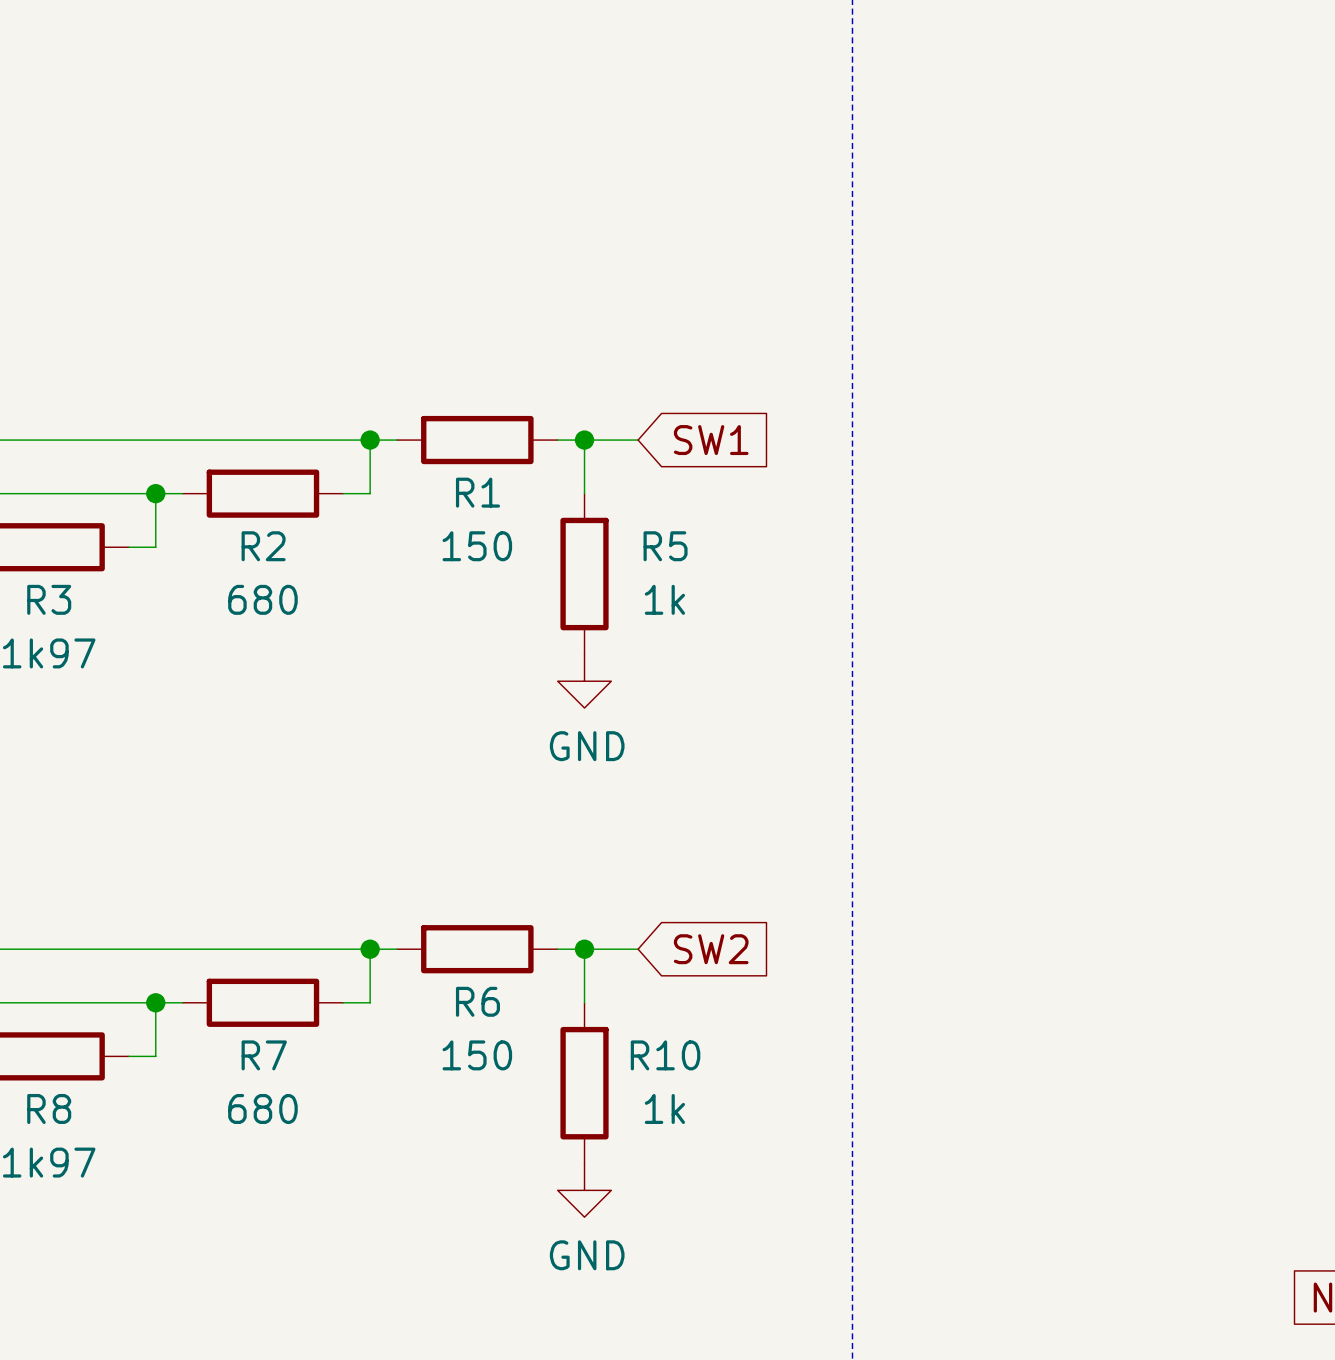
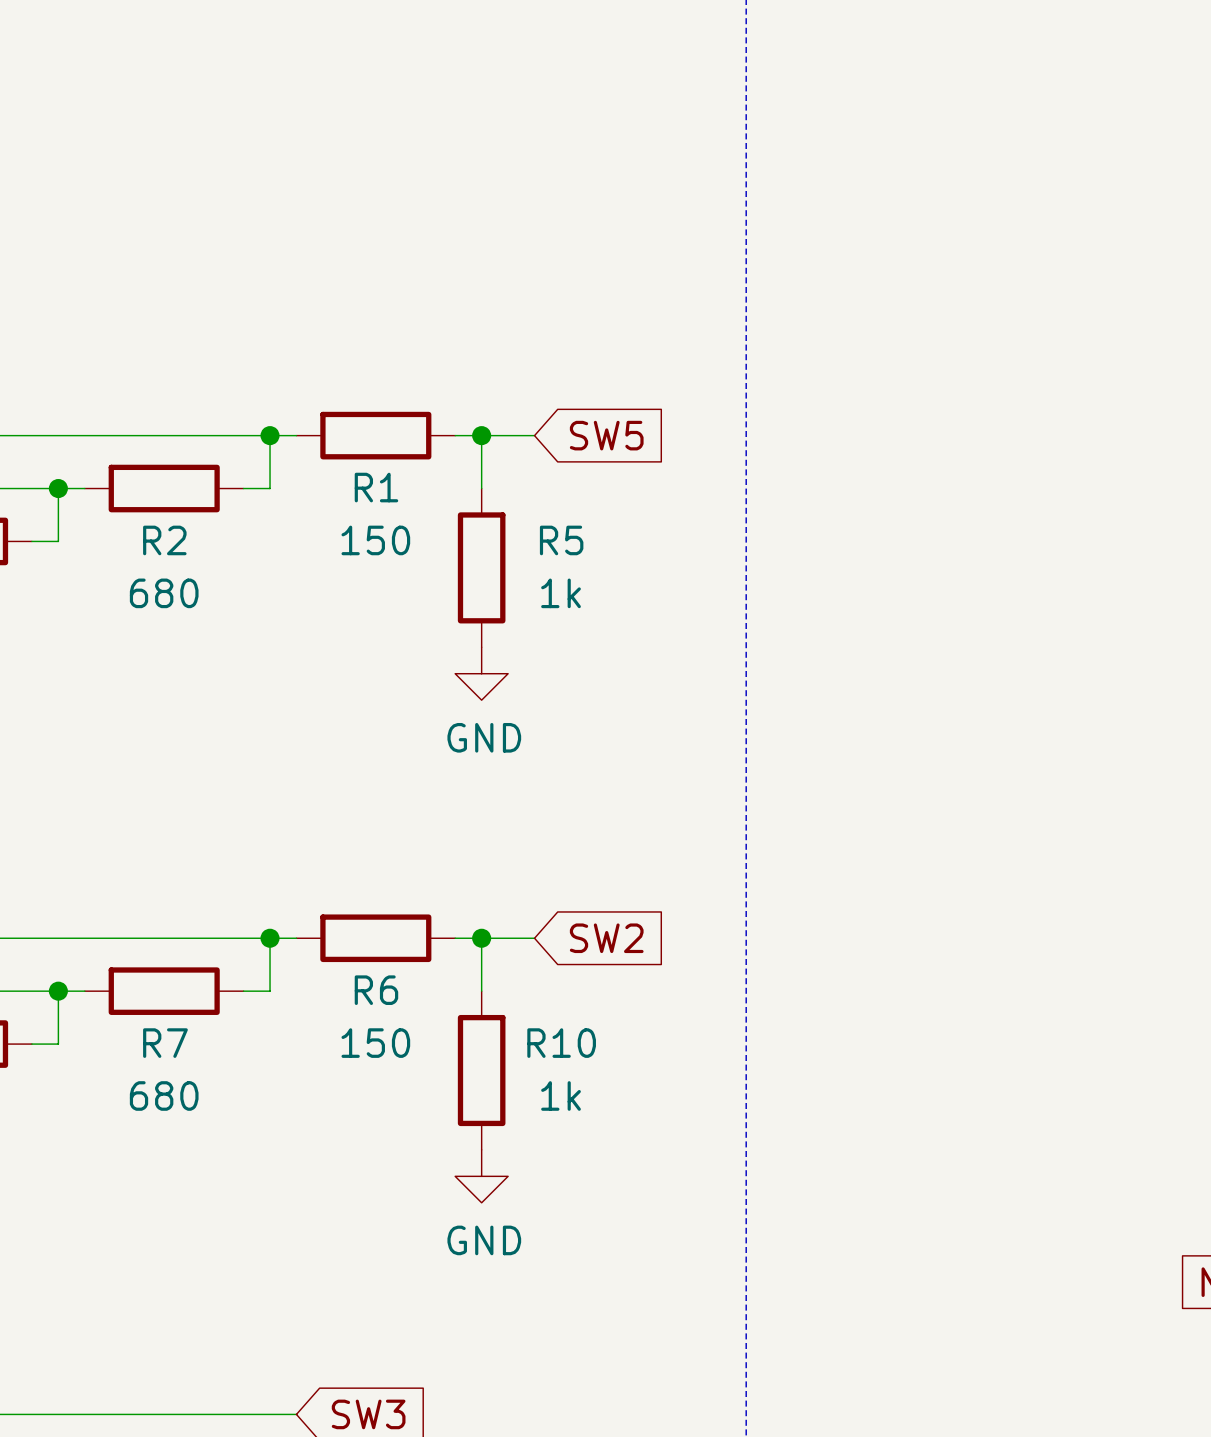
global label: SW1 (711, 440) -> SW5 (606, 435)

